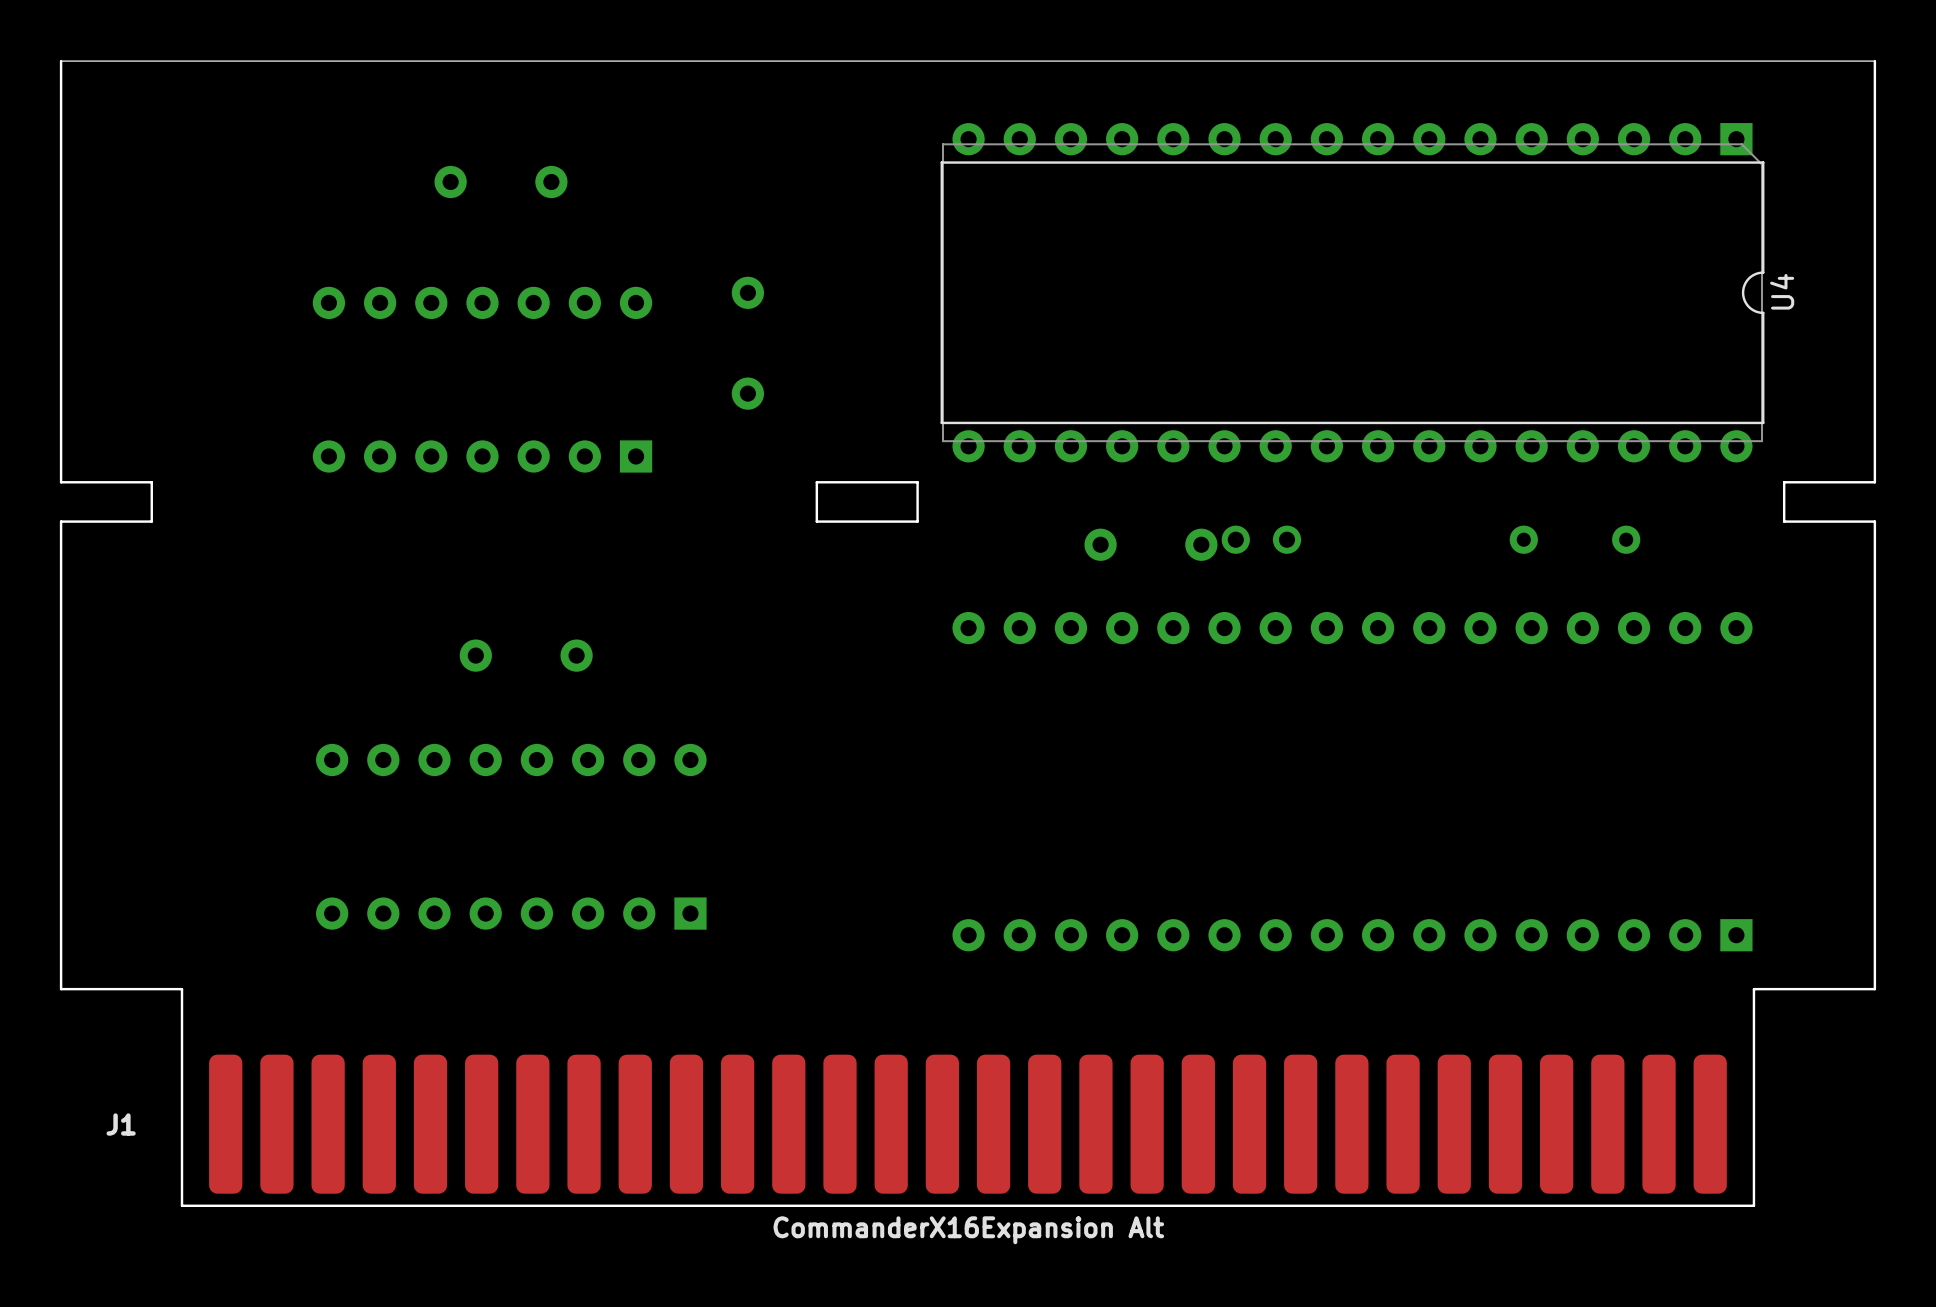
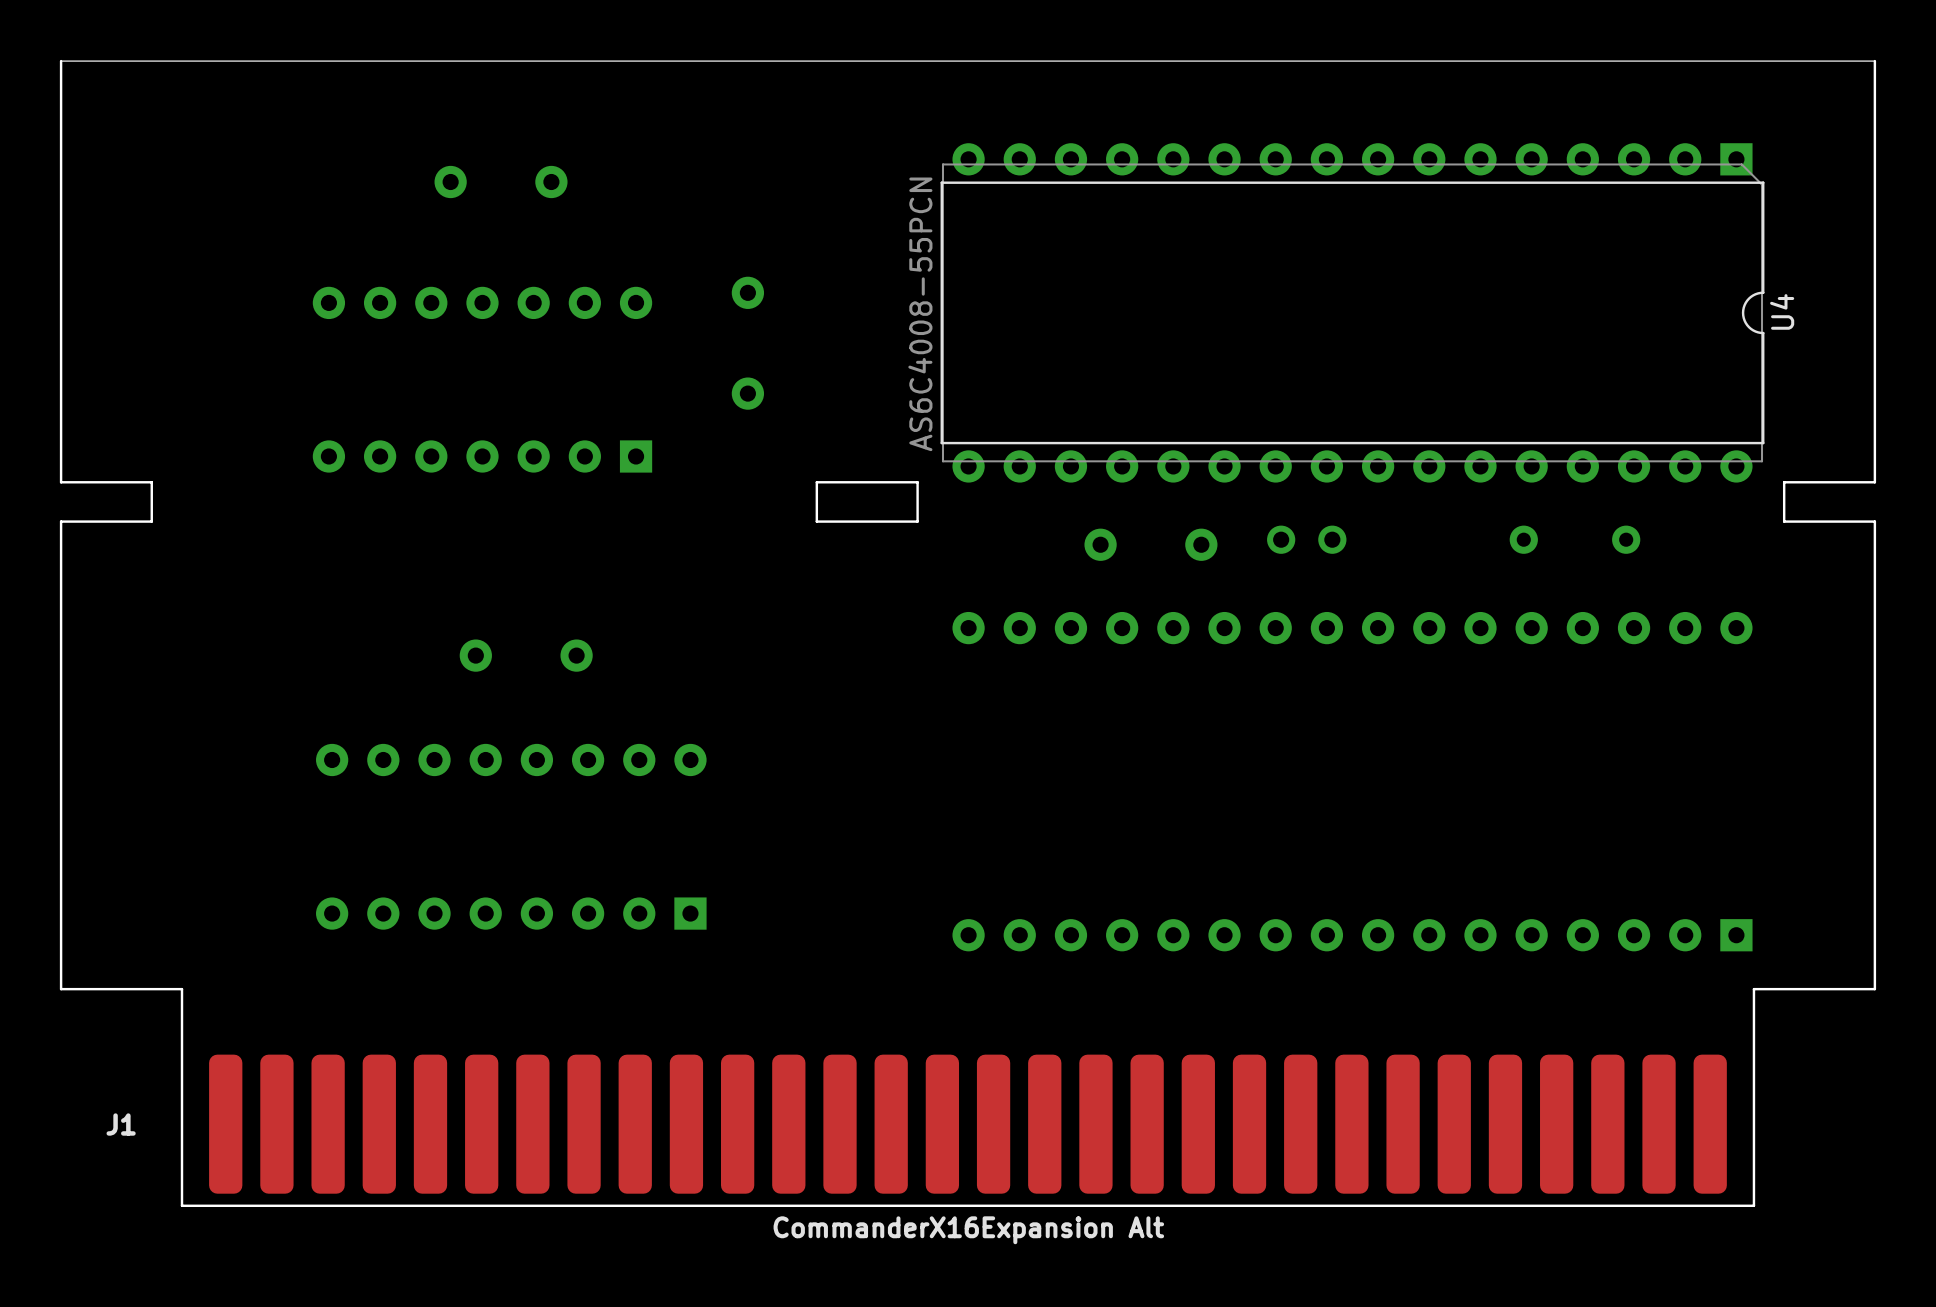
U4 position: (1352, 292) -> (1352, 312)
U4 value: none -> AS6C4008-55PCN (920, 314)
part position: (1261, 539) -> (1306, 539)

